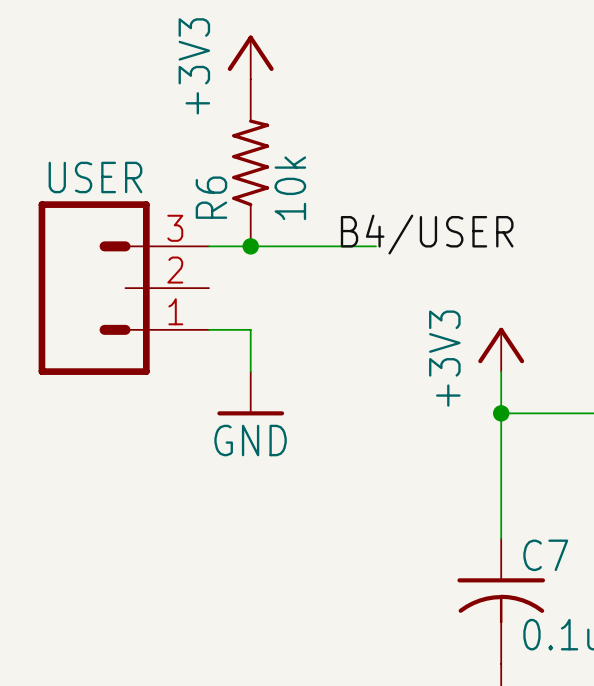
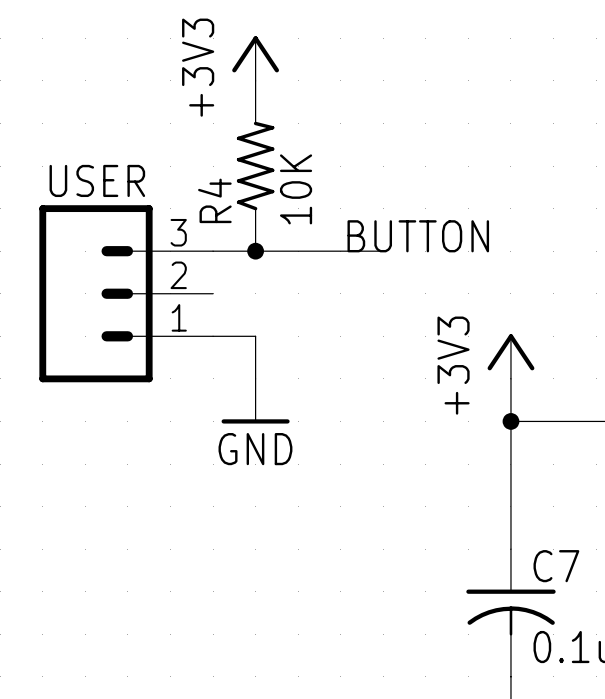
R6 value: 10k (290, 188) -> 10K (296, 189)
R6 name: R6 (211, 197) -> R4 (214, 200)
USER symbol: [38, 201, 209, 375] -> [39, 205, 214, 383]
label: B4/USER (427, 234) -> BUTTON (418, 236)

